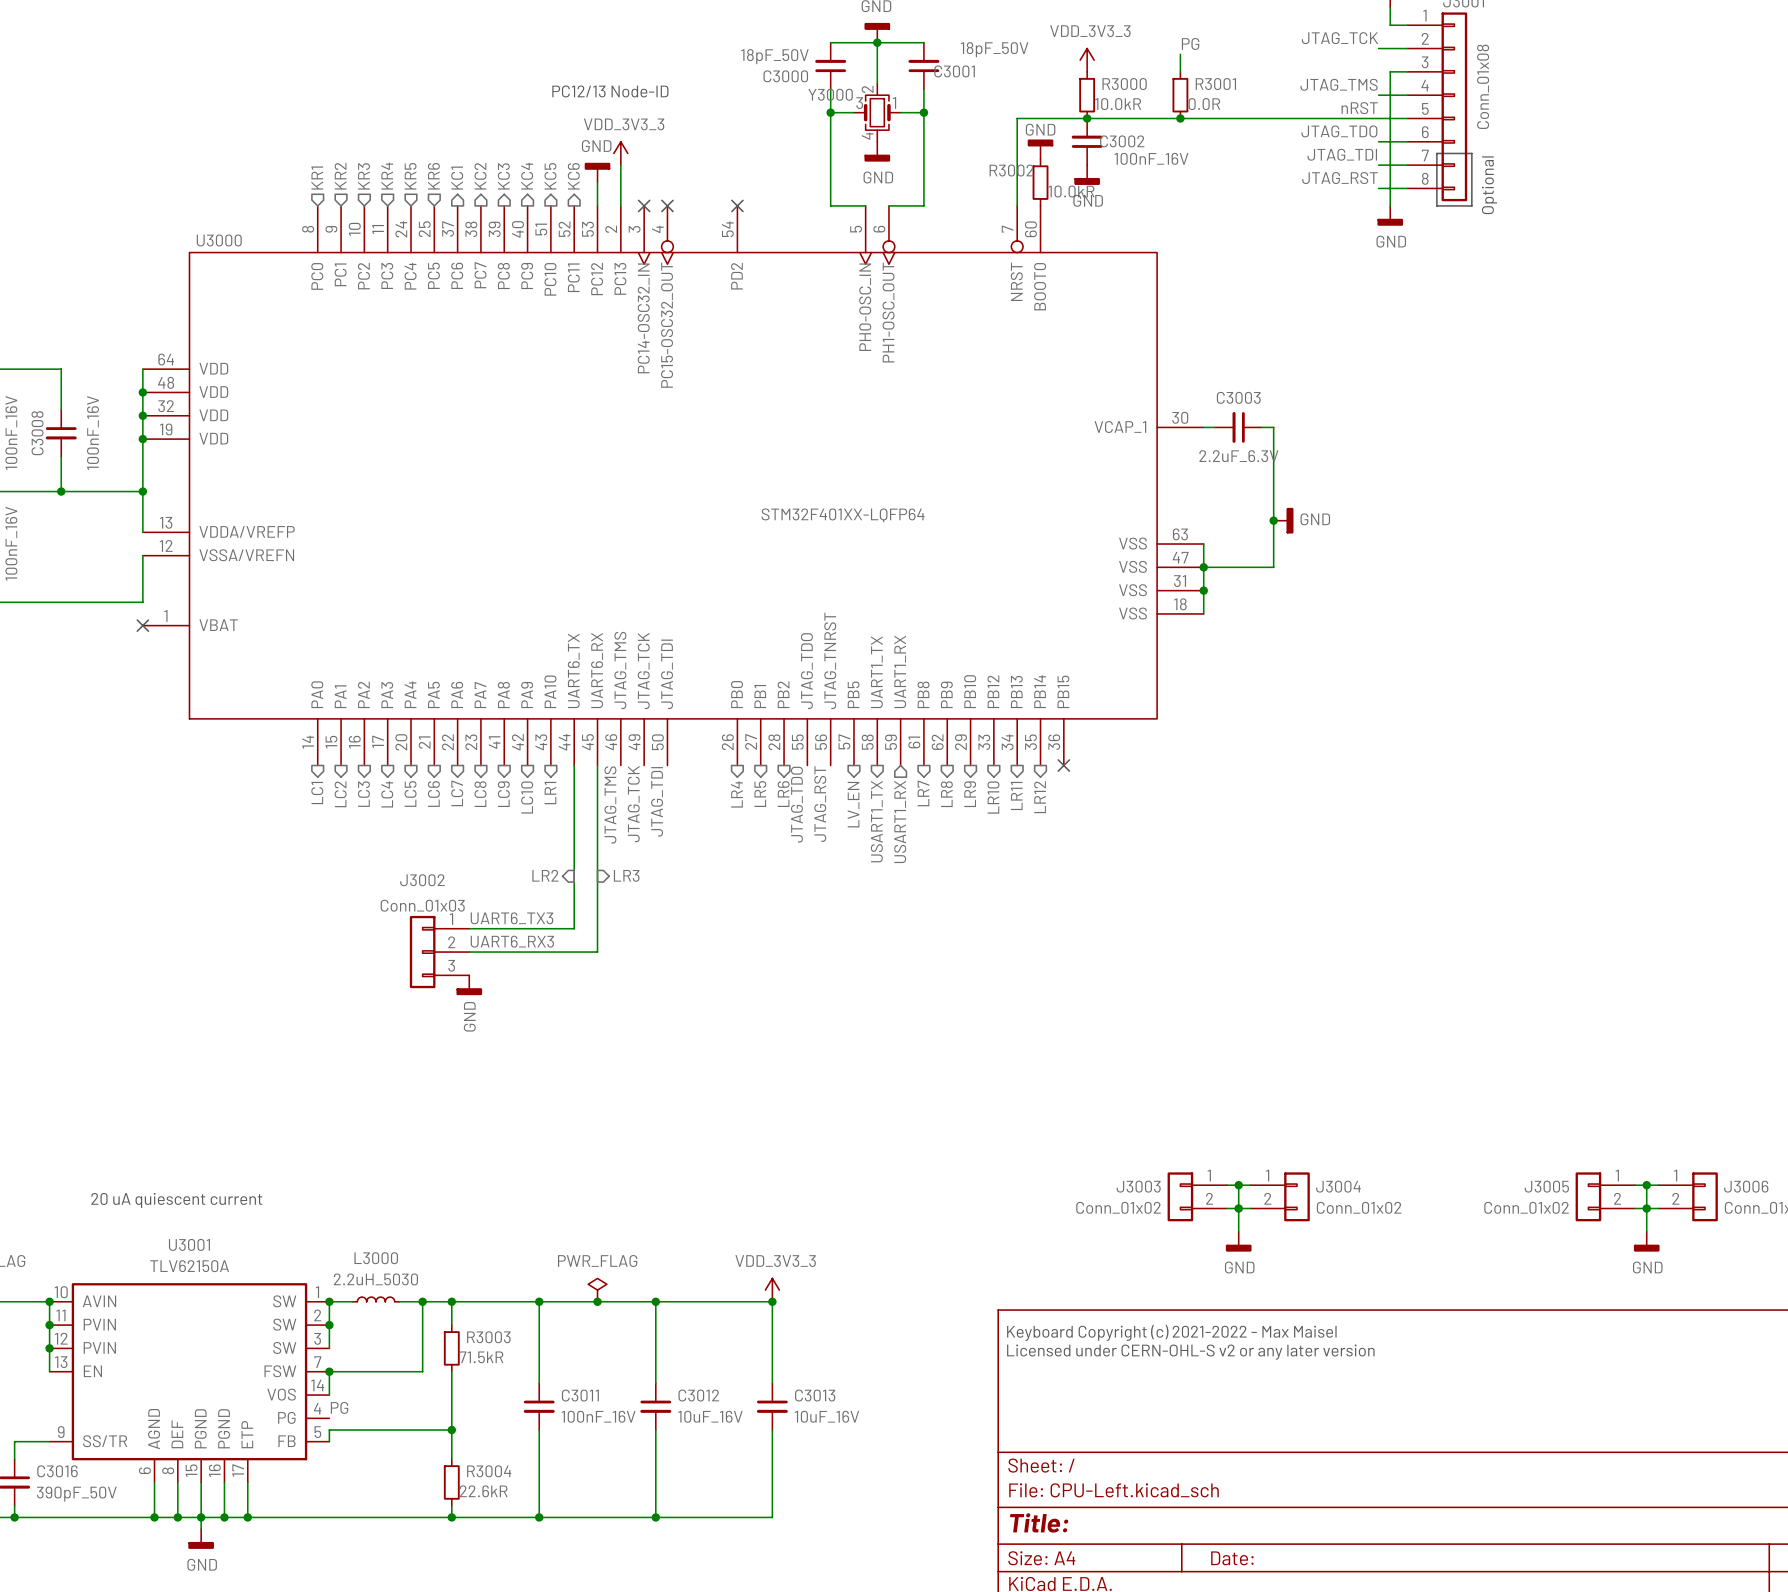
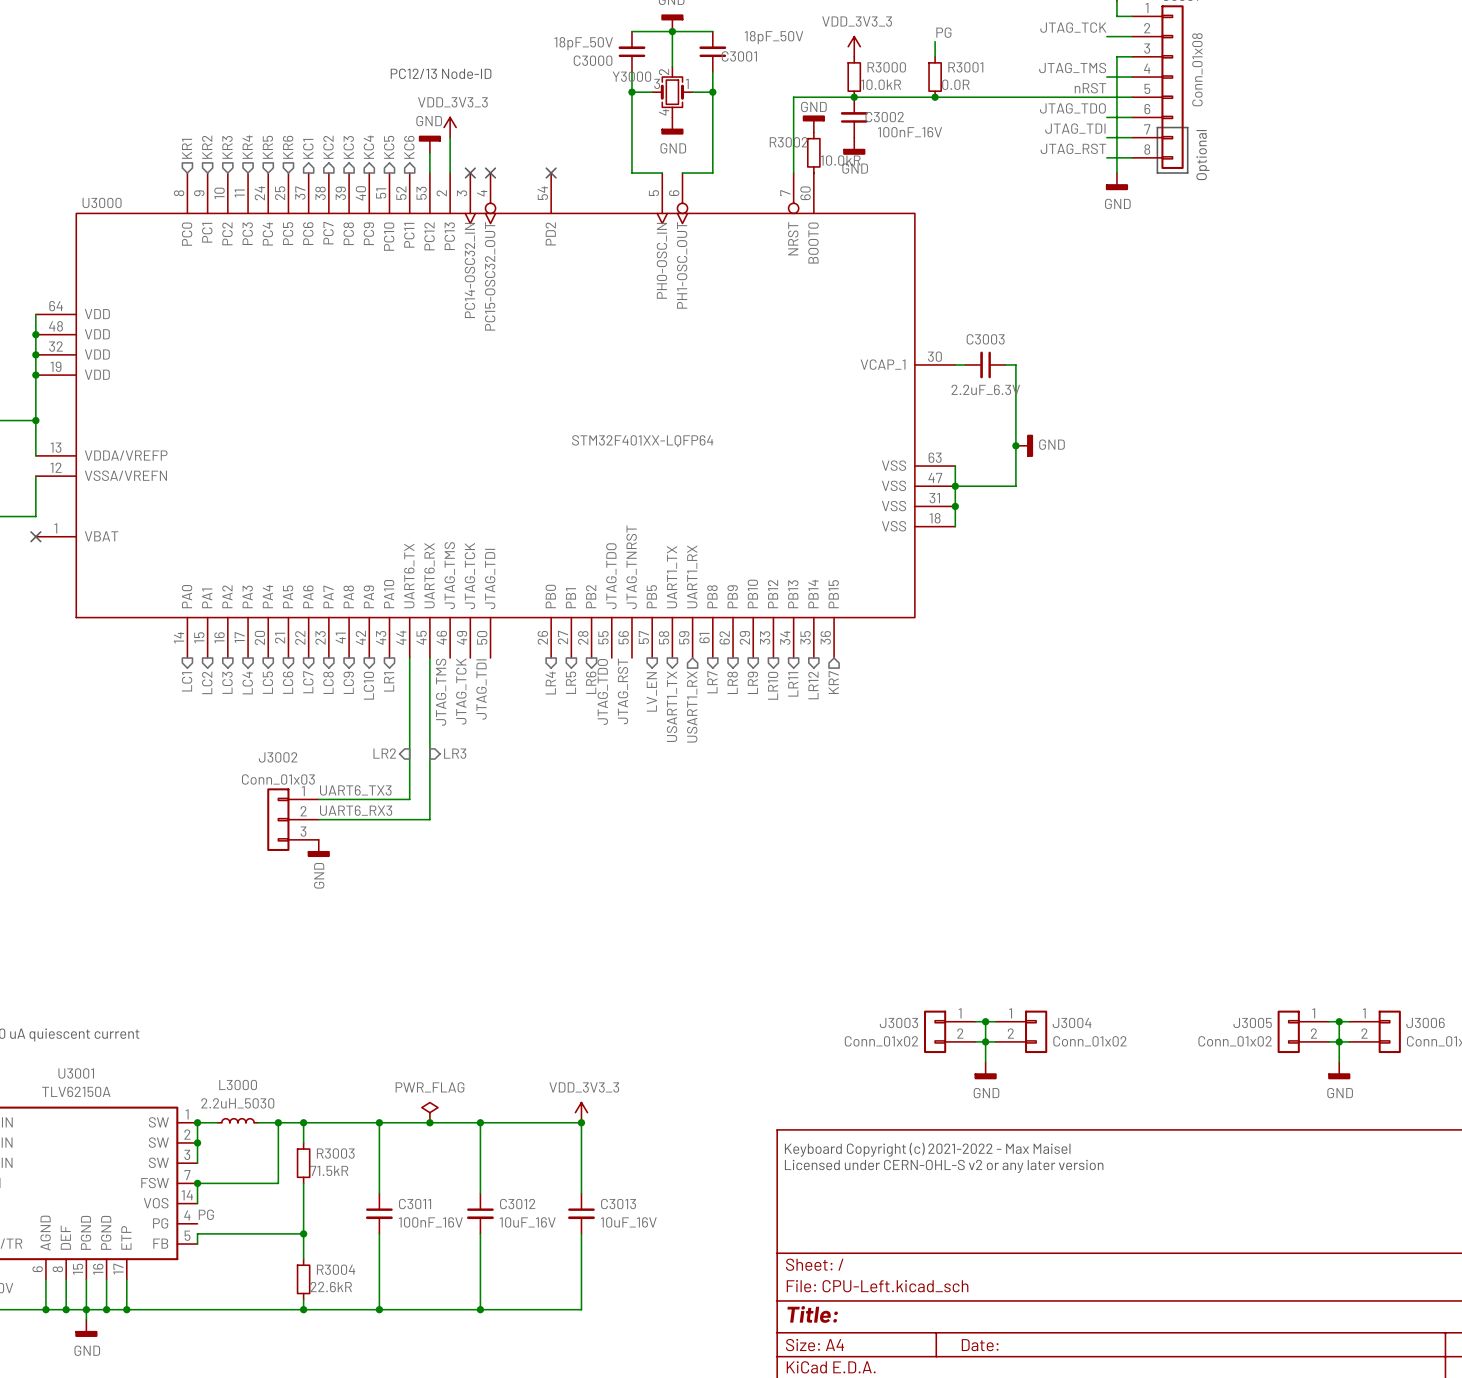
no-connect mark: (1063, 765) -> none
hierarchical label: none -> KR7 (833, 682)

